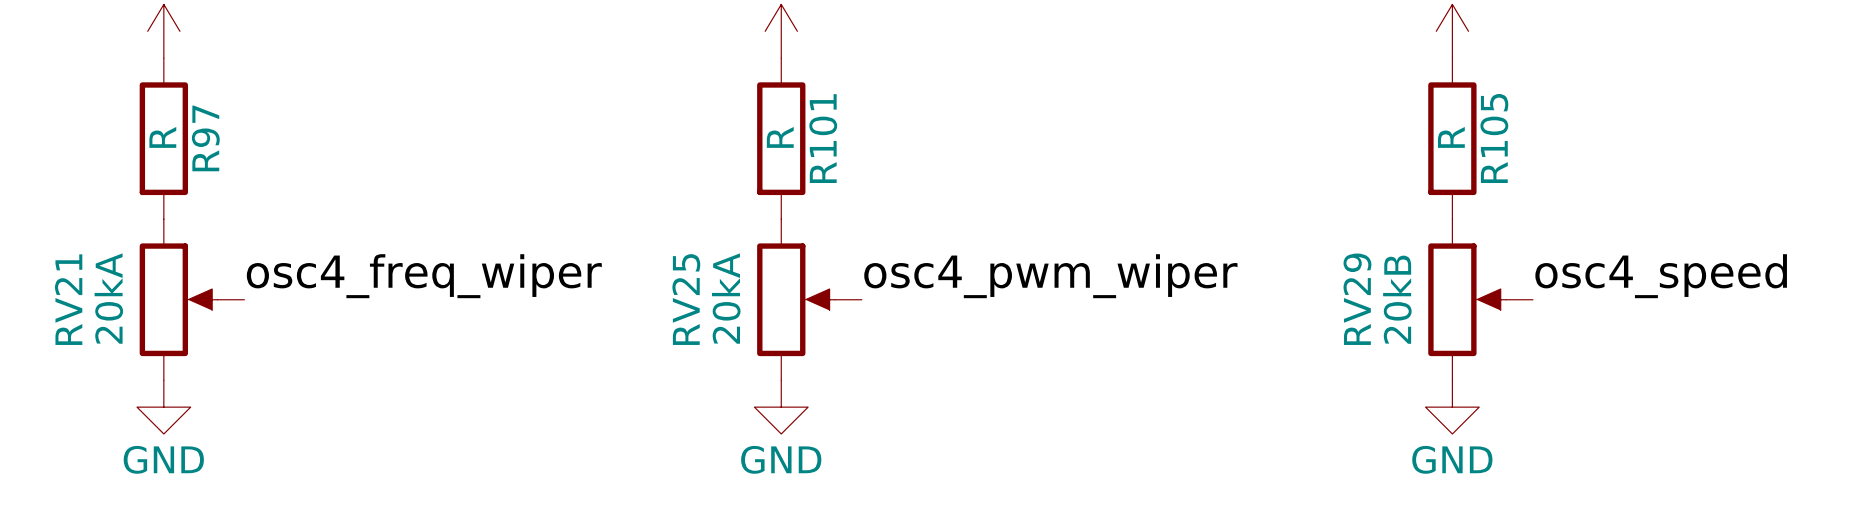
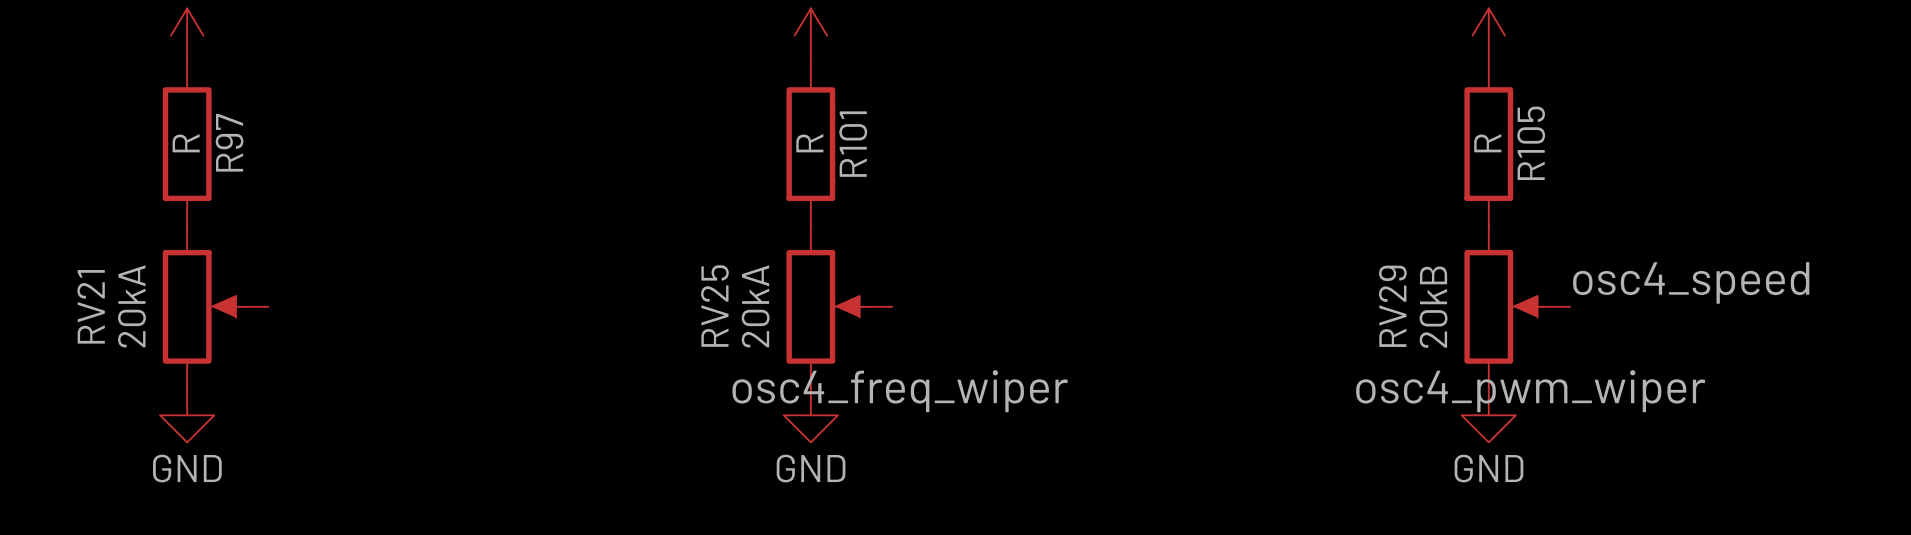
label position: osc4_freq_wiper (424, 276) -> osc4_freq_wiper (900, 391)
label position: osc4_pwm_wiper (1050, 276) -> osc4_pwm_wiper (1530, 391)

